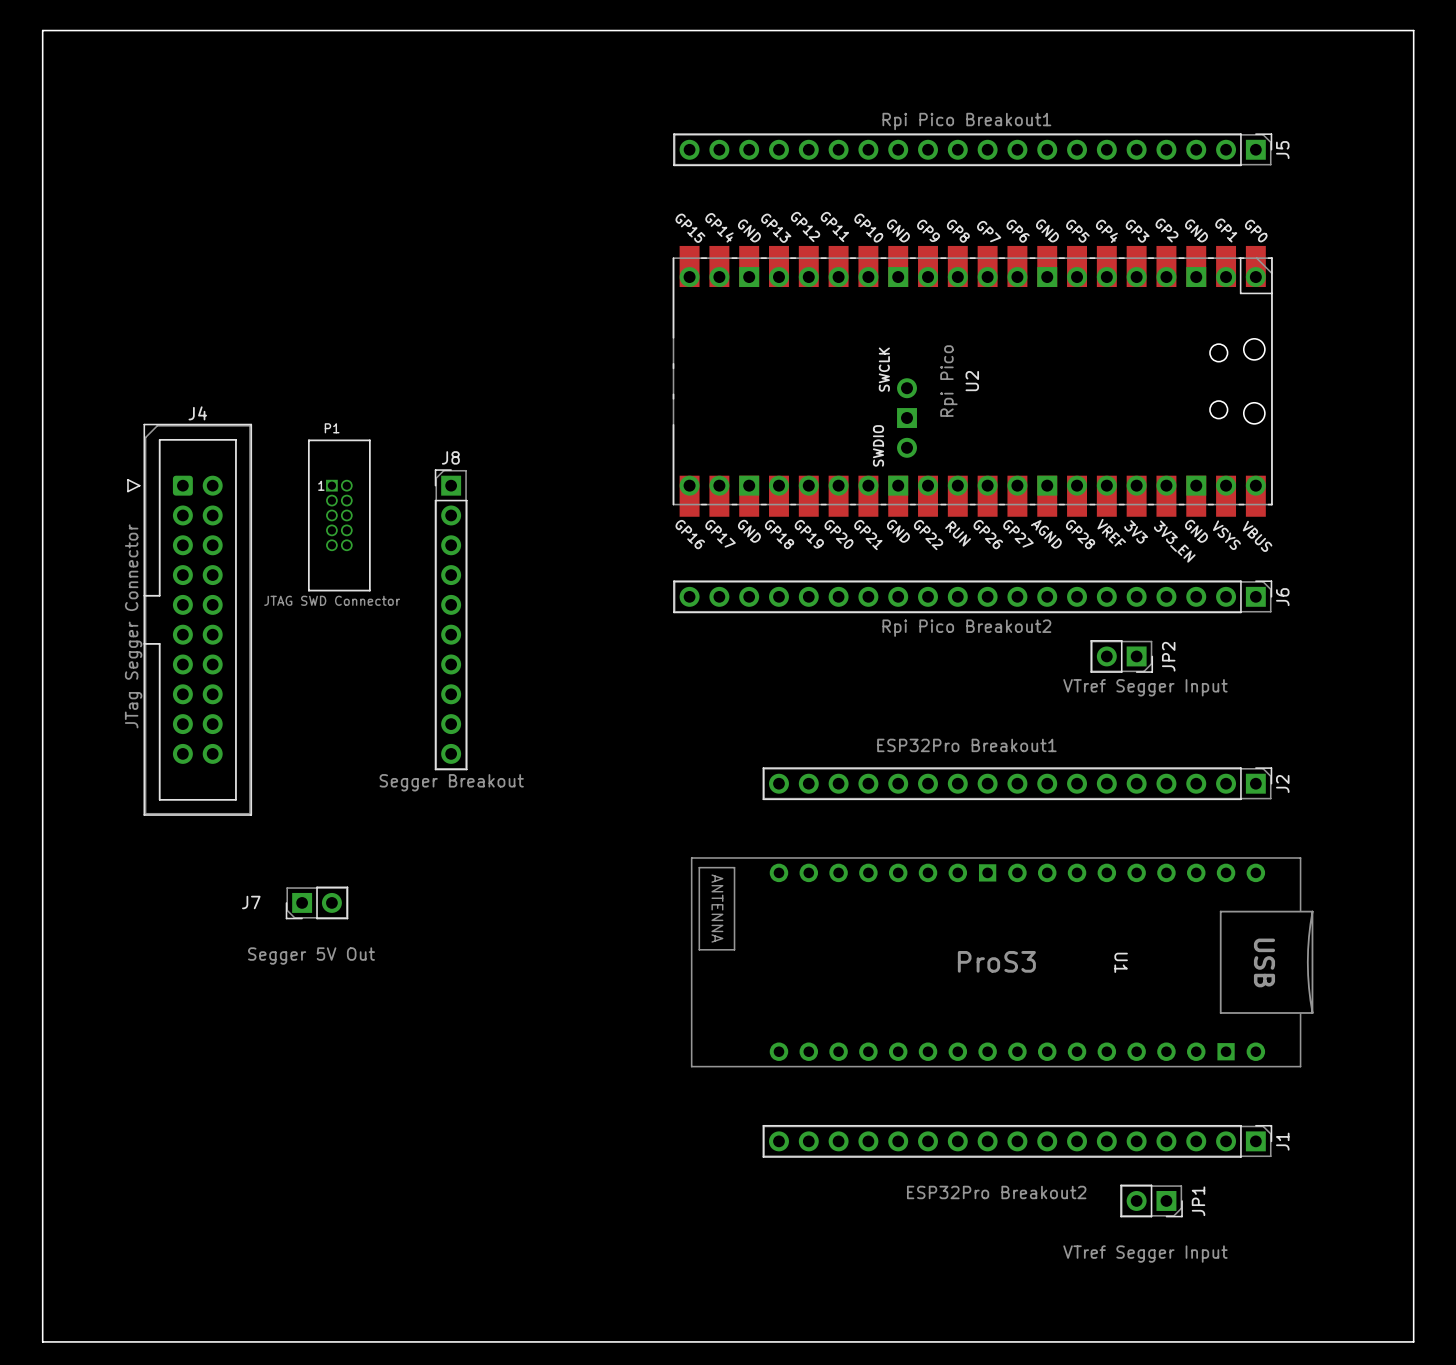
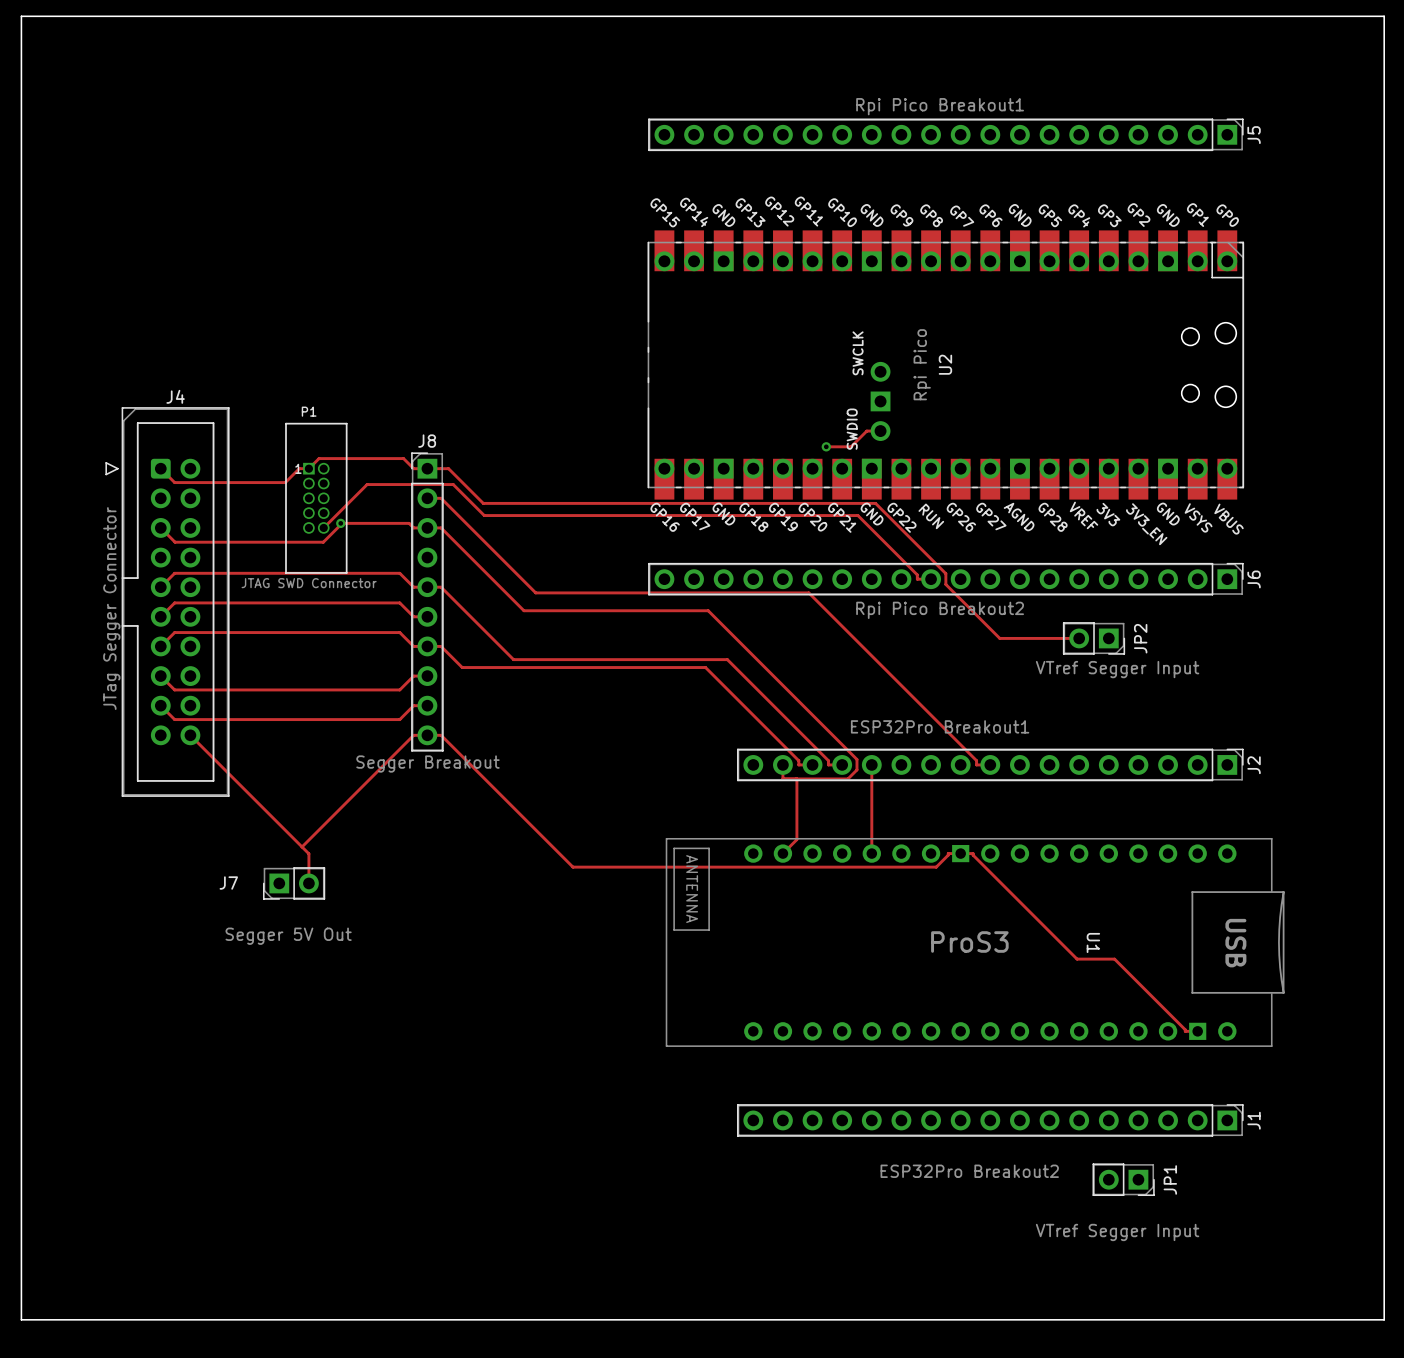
track: none -> (880, 431) (866, 431) (851, 446) (826, 446)
via: none -> (826, 446)
track: none -> (160, 468) (174, 482) (285, 482) (299, 468) (308, 468) (319, 458) (403, 458) (413, 468) (448, 468) (483, 503) (875, 503) (945, 573) (945, 584) (999, 638) (1079, 638)
track: none -> (427, 498) (441, 498) (535, 592) (808, 592) (976, 760) (976, 764) (990, 764)
via: none -> (340, 523)
track: none -> (160, 527) (175, 542) (323, 542) (340, 523) (409, 523) (413, 527) (441, 527) (523, 610) (708, 610) (856, 759) (856, 769) (847, 778) (796, 778)
track: none -> (323, 527) (367, 484) (453, 484) (484, 515) (857, 515) (917, 574) (917, 579) (931, 579)
track: none -> (160, 587) (174, 573) (399, 573) (413, 587) (441, 587) (513, 659) (727, 659) (828, 760) (828, 764) (842, 764)
track: none -> (160, 616) (174, 602) (399, 602) (413, 616) (427, 616)
track: none -> (160, 646) (174, 632) (399, 632) (413, 646) (441, 646) (462, 667) (705, 667) (798, 760) (798, 764) (812, 764)
track: none -> (160, 676) (174, 689) (399, 689) (413, 676) (427, 676)
track: none -> (160, 705) (174, 719) (399, 719) (413, 705) (427, 705)
track: none -> (190, 735) (302, 846)
track: none -> (782, 764) (782, 778) (796, 778)
track: none -> (871, 764) (871, 853)
track: none -> (796, 778) (796, 839) (782, 853)
track: none -> (302, 846) (308, 853) (308, 883)
track: none -> (302, 846) (413, 735) (441, 735) (572, 867) (936, 867) (948, 853) (973, 853) (1077, 959) (1114, 959) (1185, 1031) (1197, 1031)

